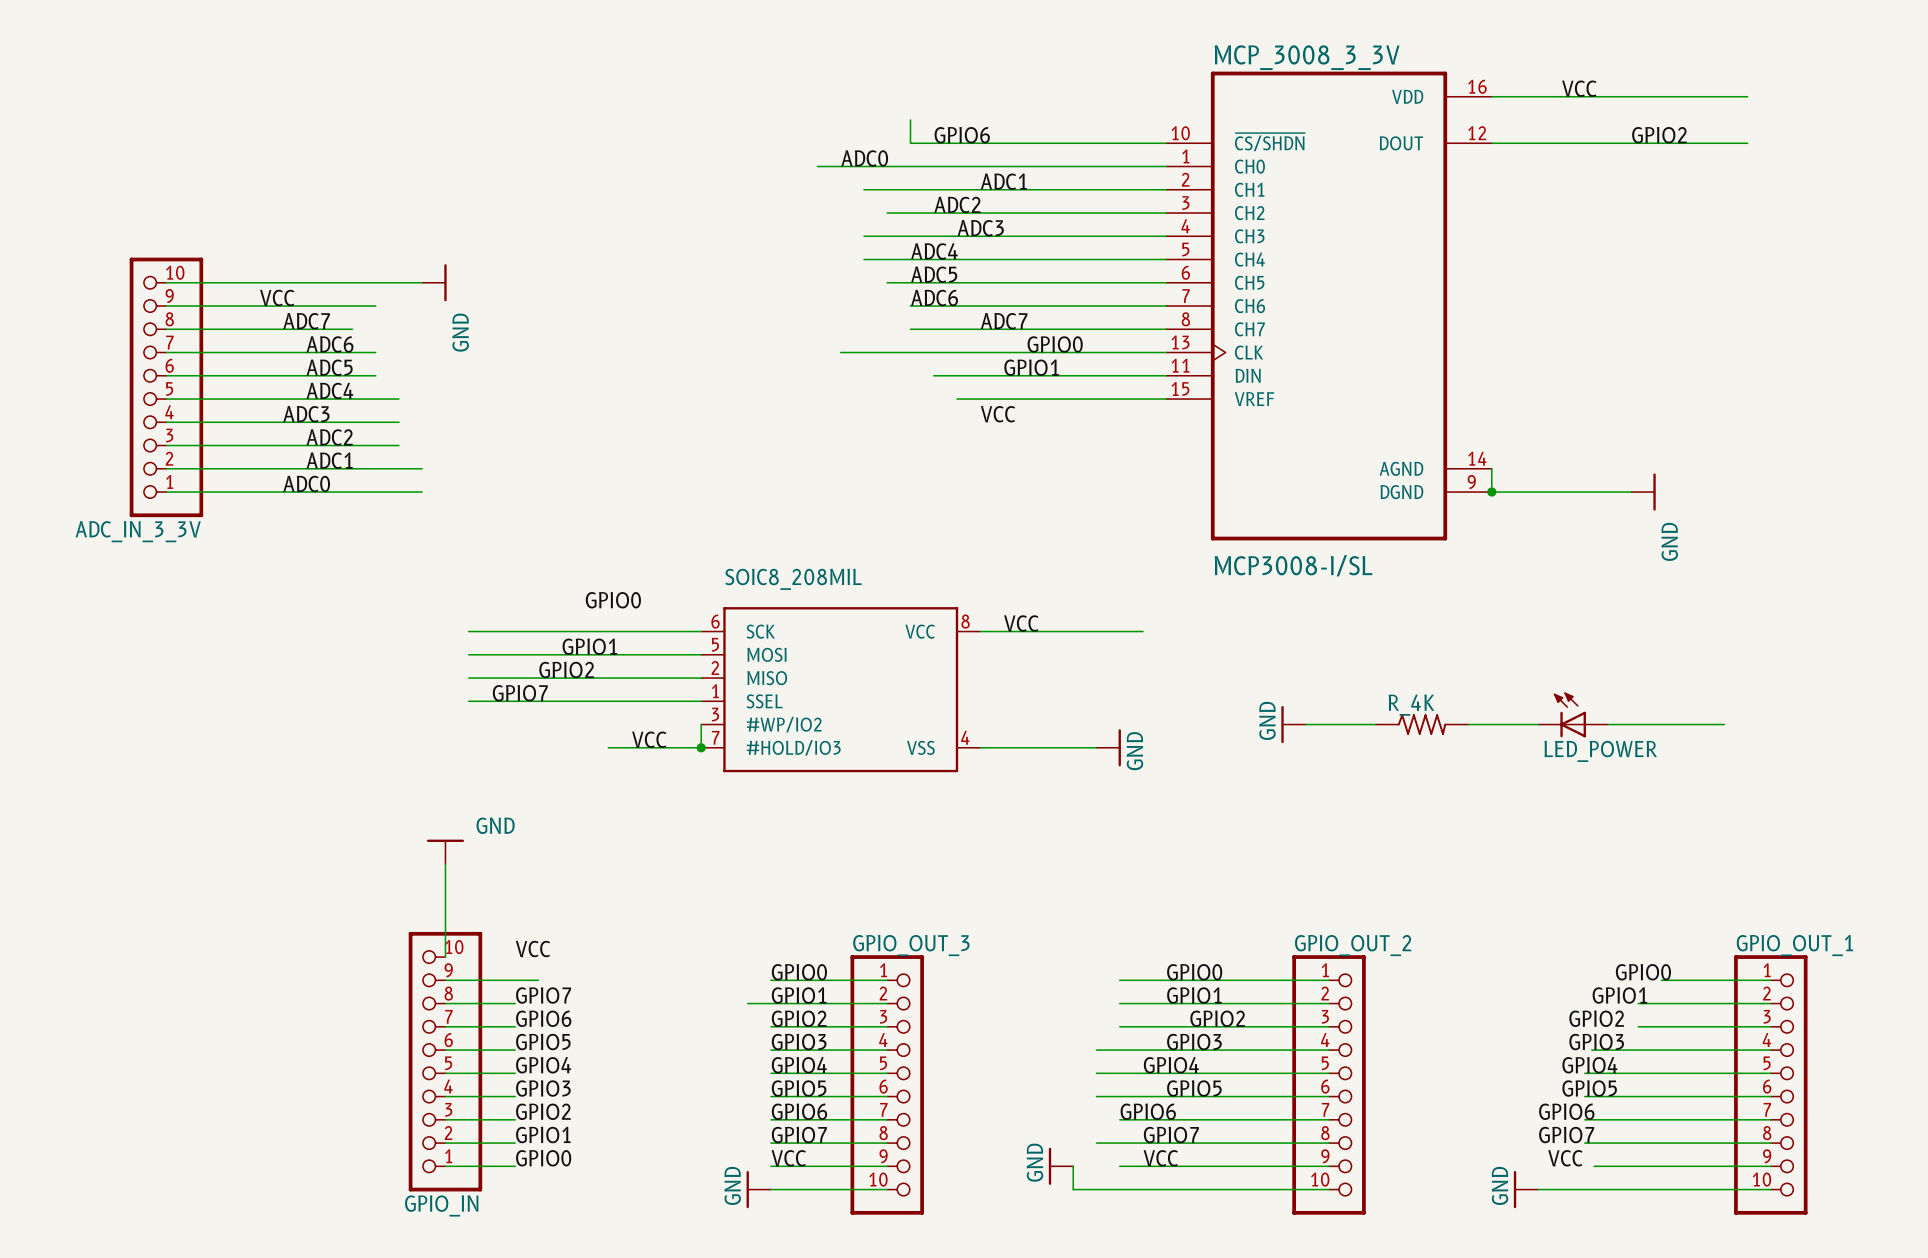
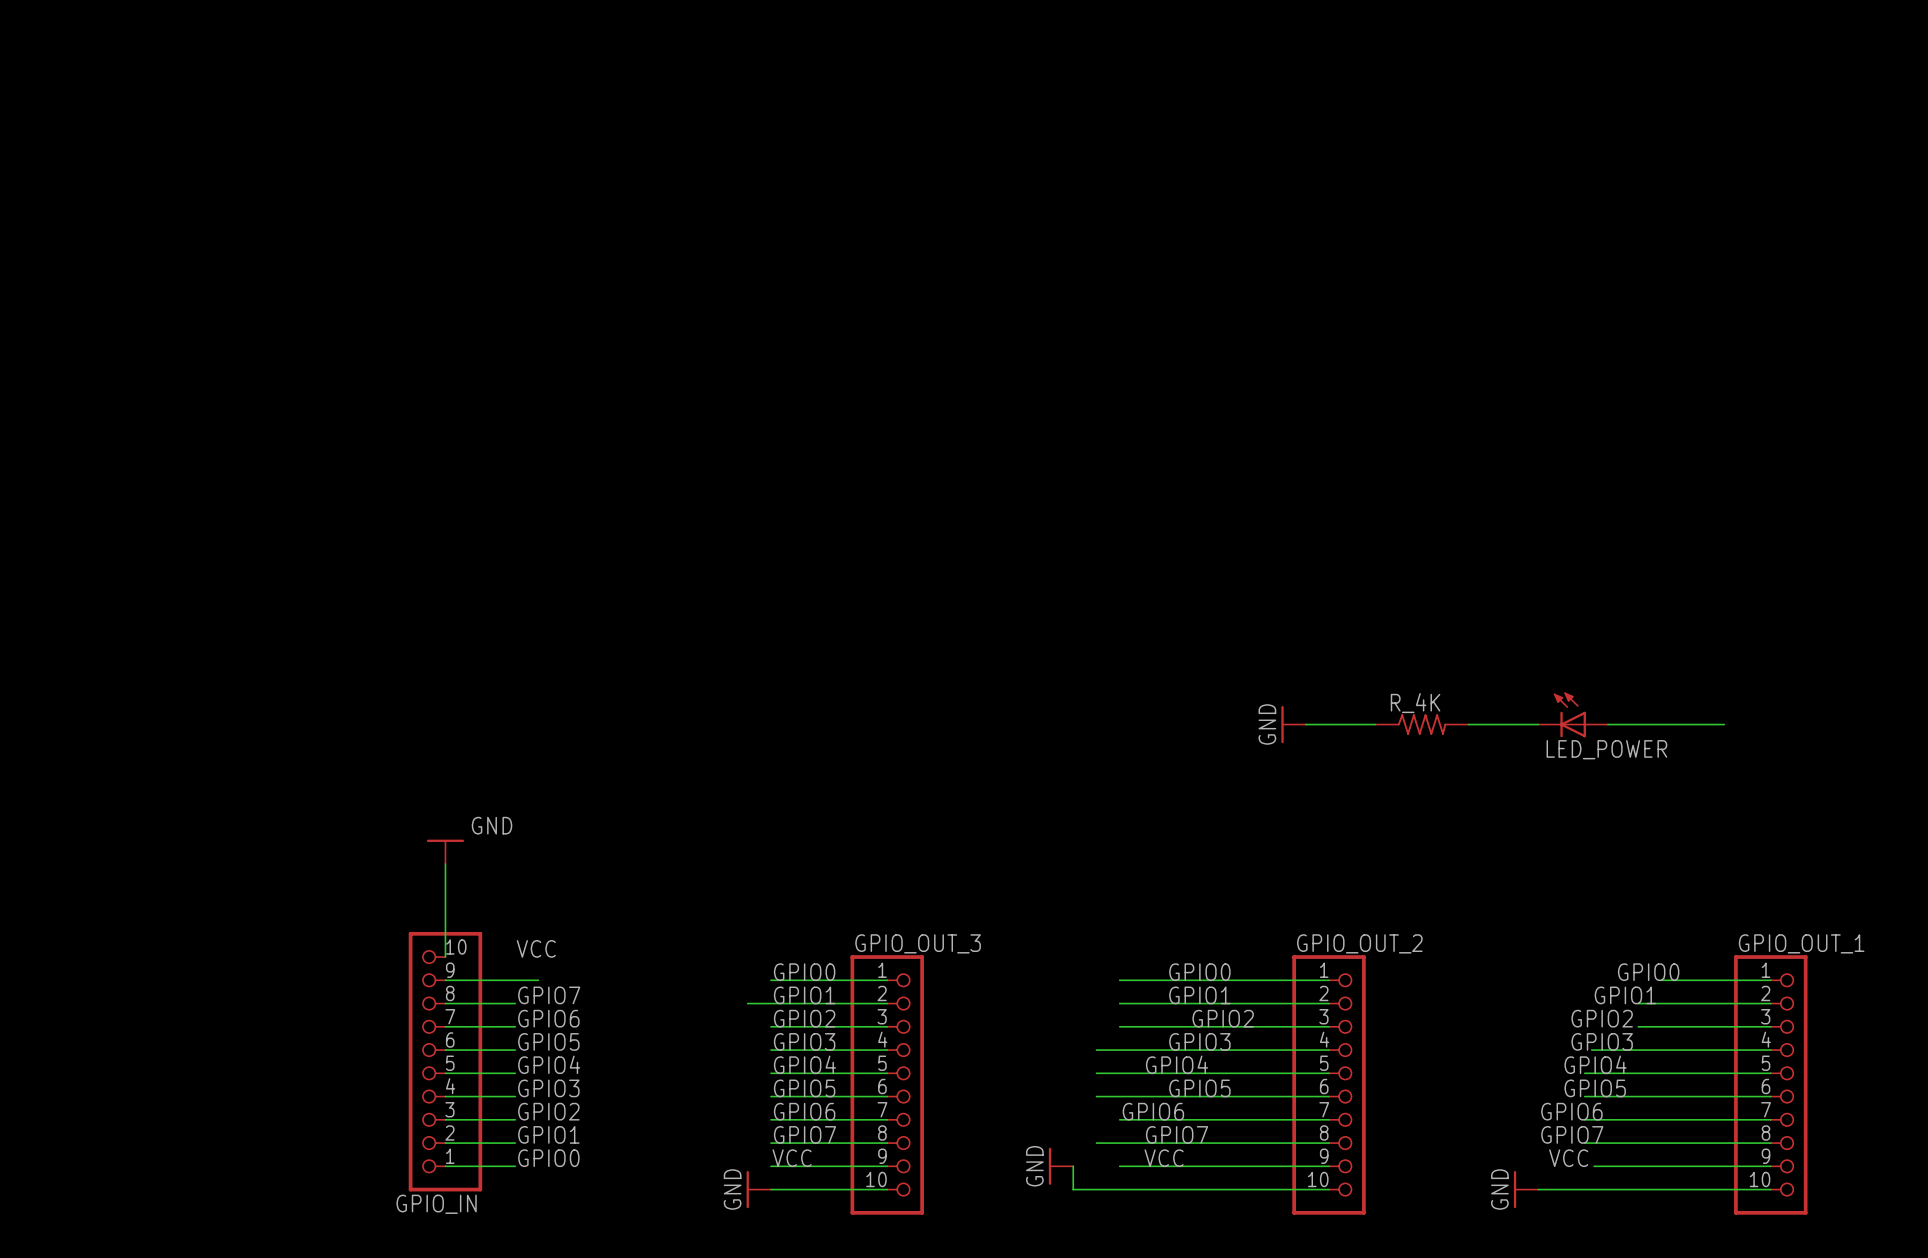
label: VCC (1579, 88) -> none
wire: (1491, 96) (1747, 96) -> none
wire: (910, 120) (910, 143) (1166, 143) -> none
label: GPIO6 (962, 135) -> none
label: GPIO2 (1659, 135) -> none
wire: (1491, 143) (1747, 143) -> none
label: ADC0 (864, 158) -> none
wire: (817, 166) (1166, 166) -> none
label: ADC1 (1003, 181) -> none
wire: (863, 189) (1166, 189) -> none
label: ADC2 (957, 204) -> none
wire: (887, 213) (1166, 213) -> none
label: ADC3 (980, 228) -> none
wire: (863, 236) (1166, 236) -> none
label: ADC4 (934, 251) -> none
wire: (863, 259) (1166, 259) -> none
label: ADC5 (934, 274) -> none
wire: (166, 282) (422, 282) -> none
power symbol: GND (434, 282) -> none
wire: (887, 282) (1166, 282) -> none
label: VCC (277, 297) -> none
label: ADC6 (934, 297) -> none
wire: (166, 306) (375, 306) -> none
wire: (910, 306) (1166, 306) -> none
MCP_3008_3_3V: MCP3008-I/SL (1329, 306) -> none
label: ADC7 (306, 321) -> none
label: ADC7 (1004, 321) -> none
wire: (166, 329) (352, 329) -> none
wire: (910, 329) (1166, 329) -> none
label: ADC6 (329, 344) -> none
label: GPIO0 (1055, 344) -> none
wire: (166, 352) (375, 352) -> none
wire: (840, 352) (1166, 352) -> none
label: ADC5 (329, 367) -> none
label: GPIO1 (1031, 367) -> none
wire: (166, 375) (375, 375) -> none
wire: (933, 375) (1166, 375) -> none
ADC_IN_3_3V: (166, 387) -> none
label: ADC4 (329, 390) -> none
wire: (166, 399) (398, 399) -> none
wire: (956, 399) (1166, 399) -> none
label: ADC3 (306, 414) -> none
label: VCC (998, 414) -> none
wire: (166, 422) (398, 422) -> none
label: ADC2 (329, 437) -> none
wire: (166, 445) (398, 445) -> none
label: ADC1 (329, 460) -> none
wire: (166, 468) (422, 468) -> none
wire: (1491, 468) (1491, 492) (1631, 492) -> none
label: ADC0 (306, 483) -> none
wire: (166, 492) (422, 492) -> none
junction: (1491, 492) -> none
power symbol: GND (1643, 492) -> none
label: GPIO0 (613, 600) -> none
label: VCC (1021, 623) -> none
wire: (468, 631) (701, 631) -> none
wire: (980, 631) (1143, 631) -> none
label: GPIO1 (589, 646) -> none
wire: (468, 654) (701, 654) -> none
label: GPIO2 (566, 669) -> none
wire: (468, 678) (701, 678) -> none
SOIC8_208MIL: (840, 689) -> none
label: GPIO7 (520, 693) -> none
wire: (468, 701) (701, 701) -> none
wire: (701, 724) (701, 747) (608, 747) -> none
label: VCC (649, 739) -> none
junction: (701, 747) -> none
wire: (980, 747) (1096, 747) -> none
power symbol: GND (1108, 747) -> none

